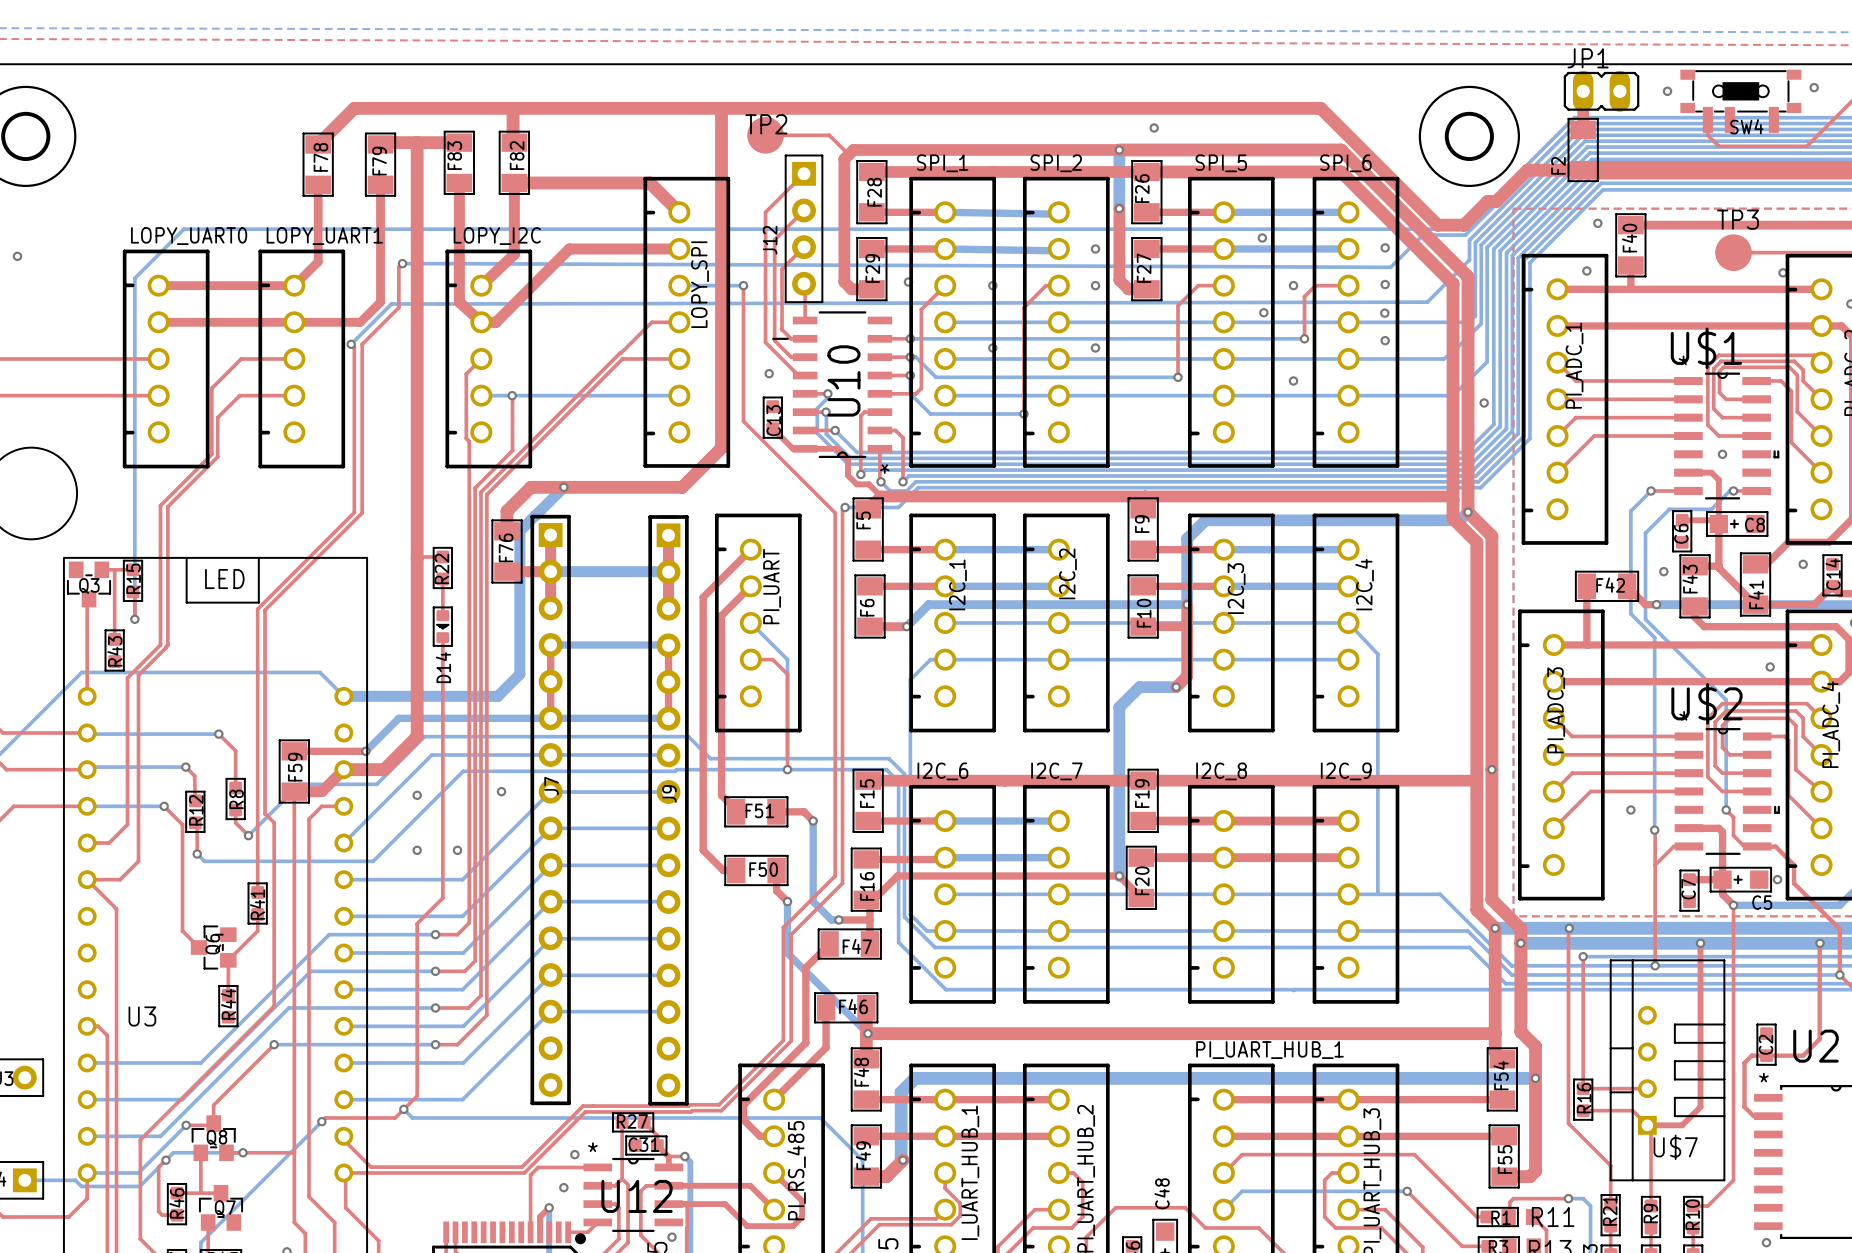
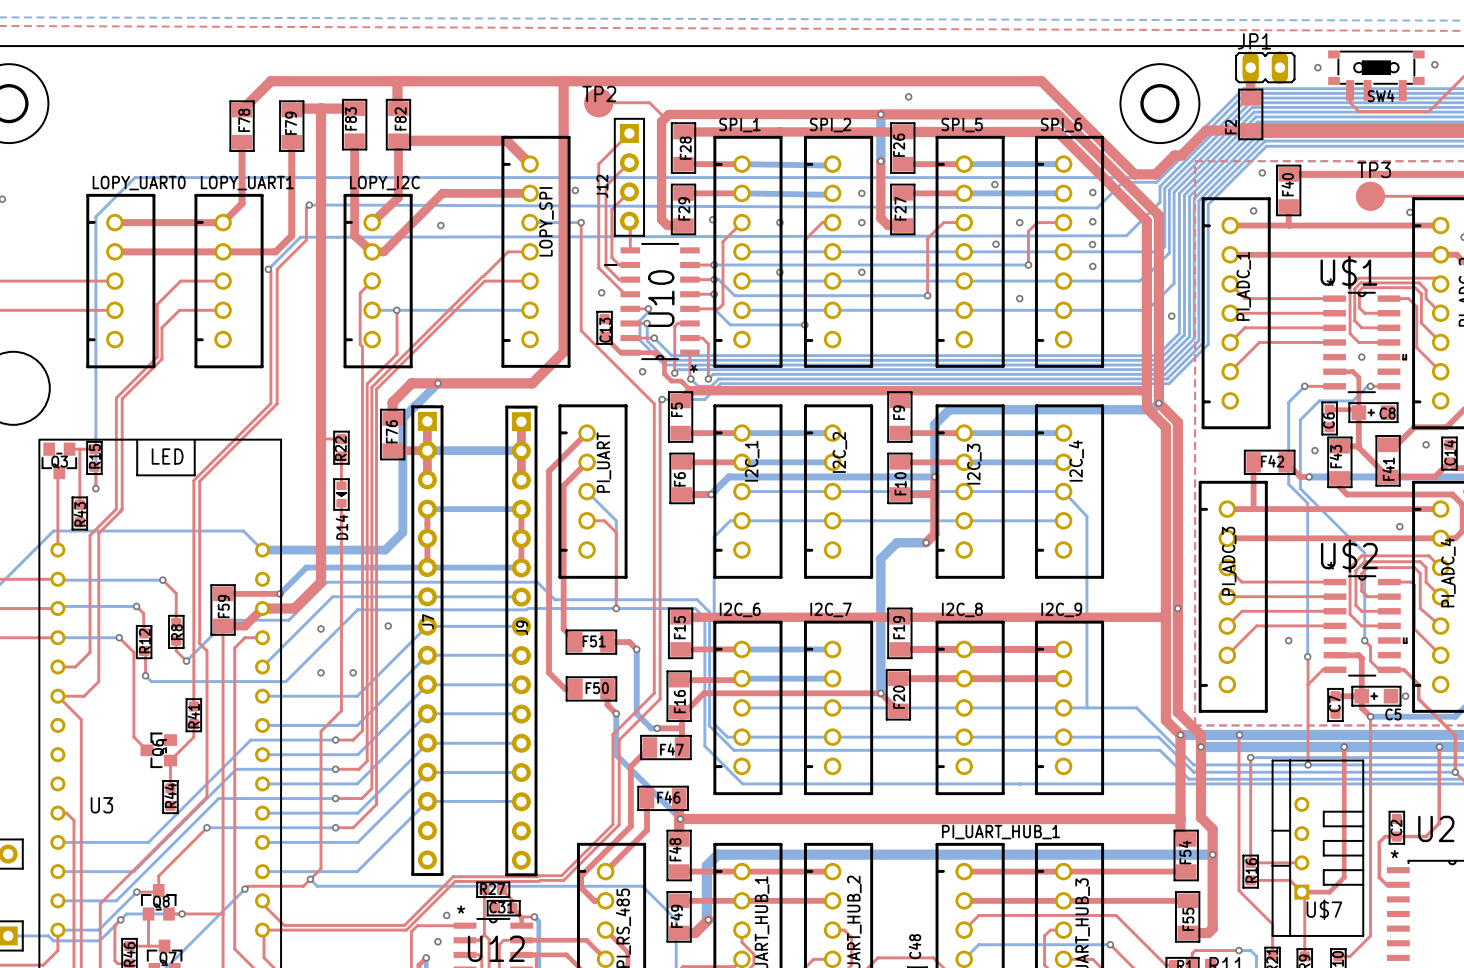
via: none -> (575, 190)
via: none -> (440, 225)
via: none -> (642, 371)

